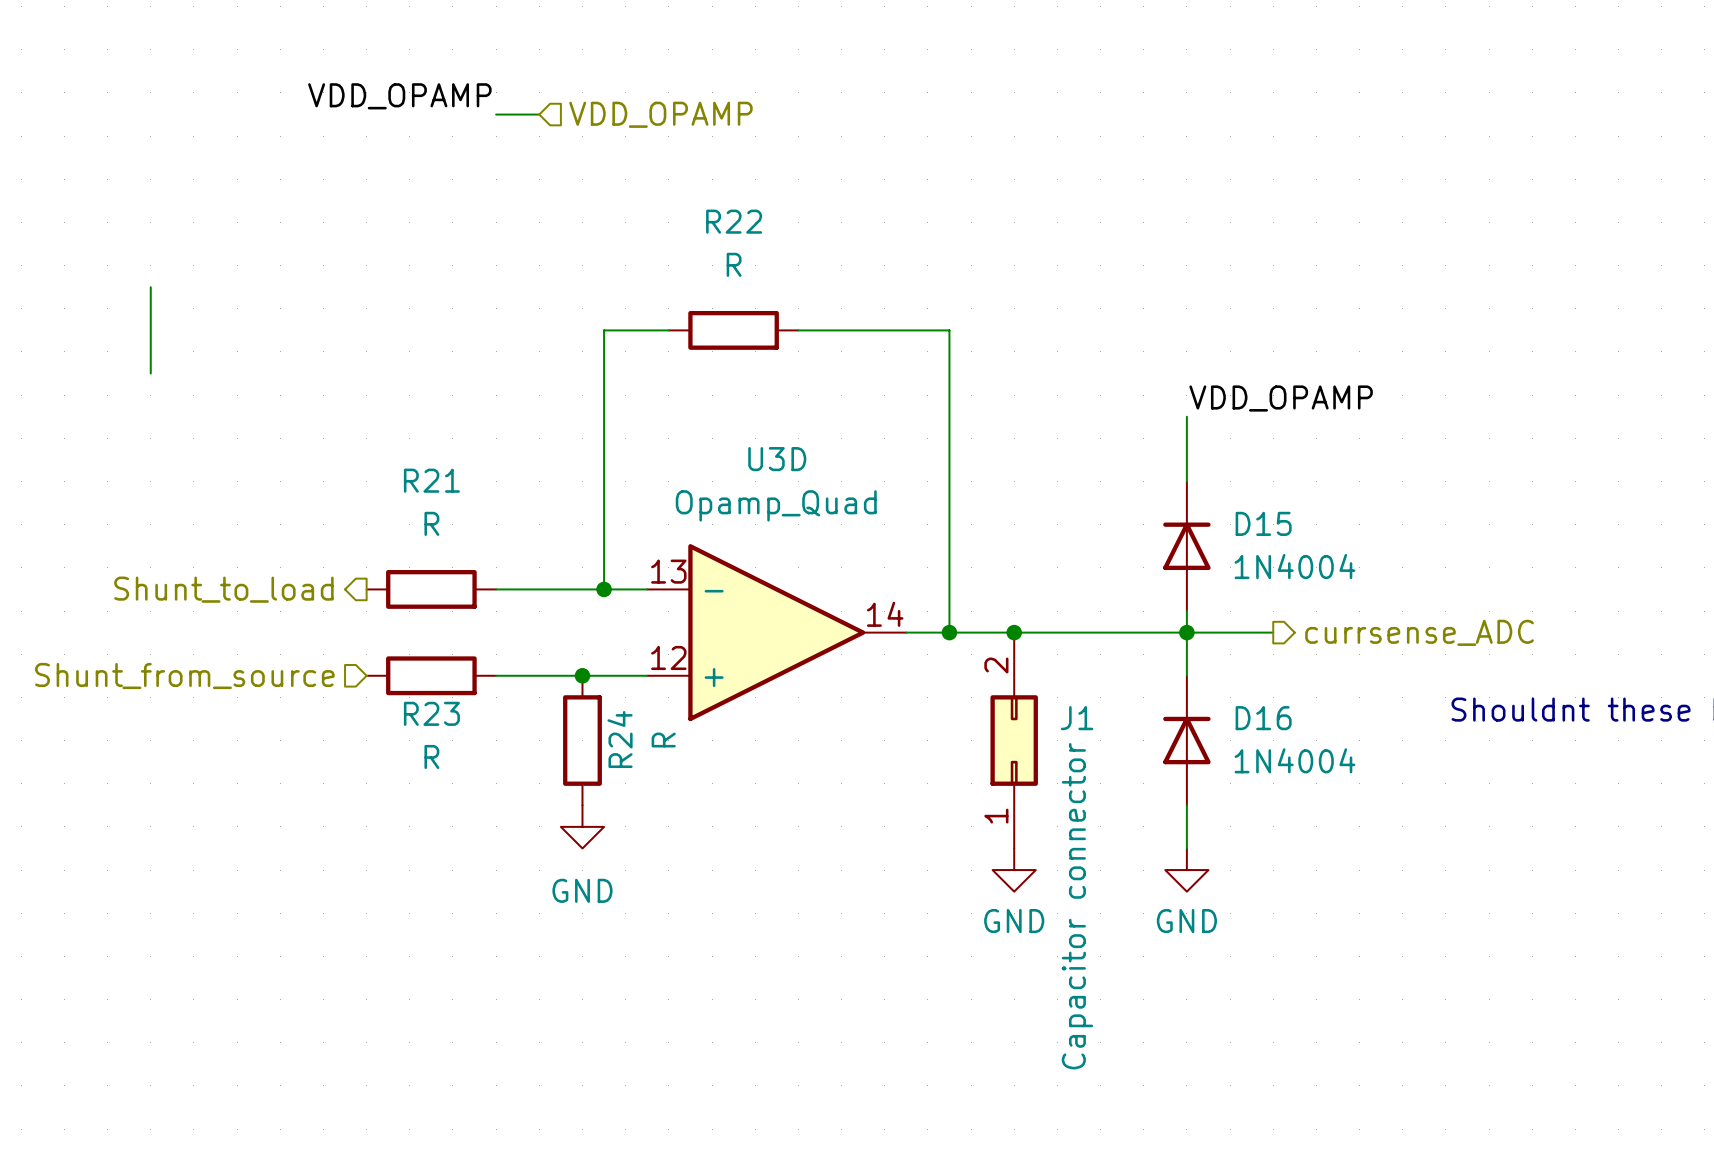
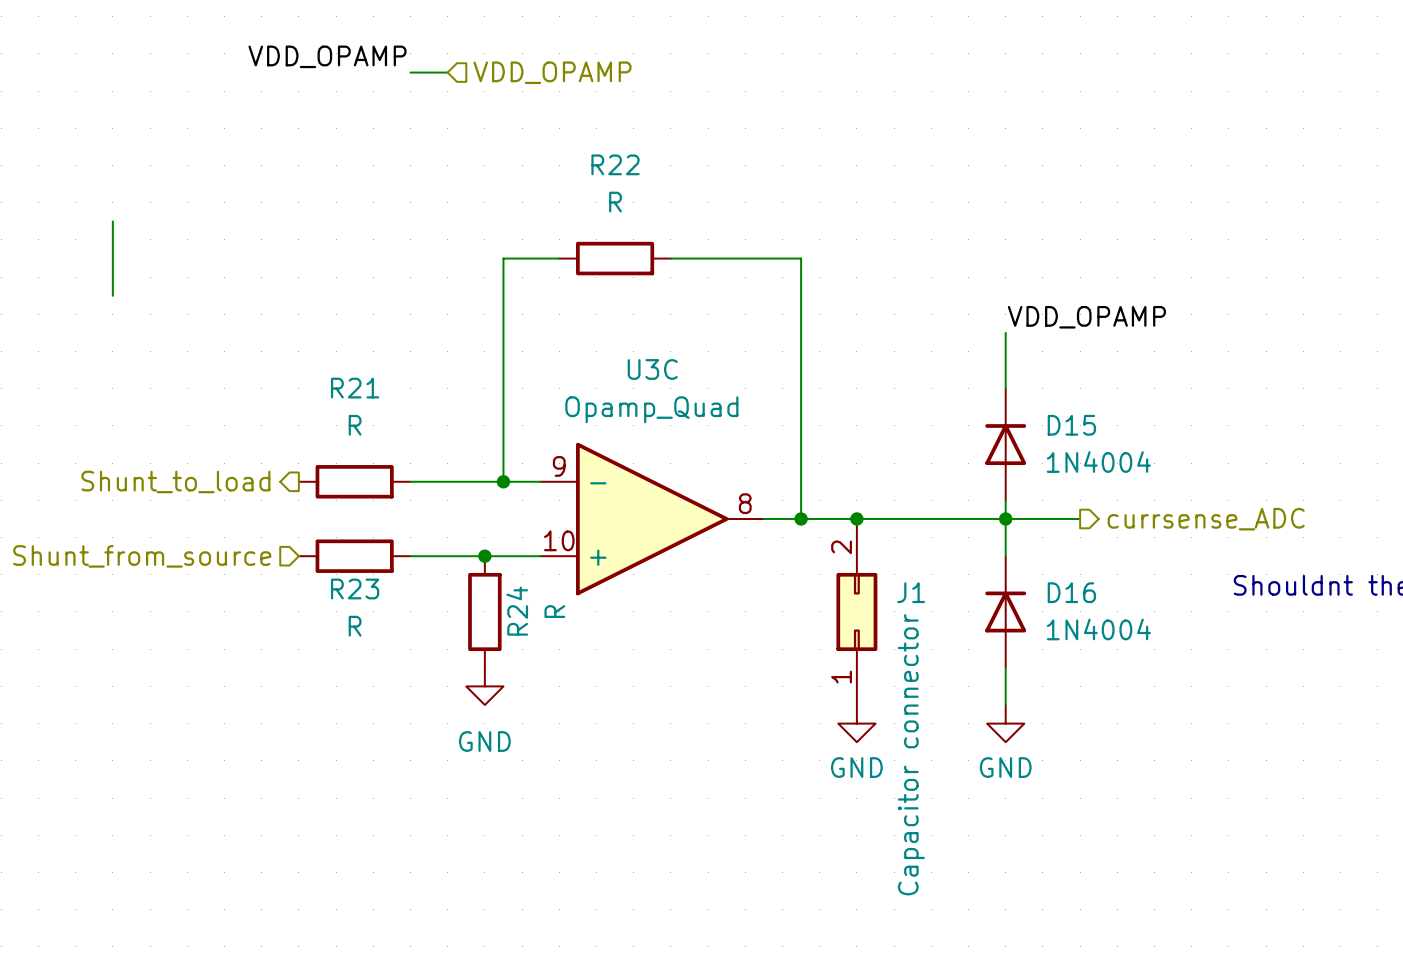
U3D name: U3D (777, 459) -> U3C (652, 369)
U3D pin number: 13 (668, 571) -> 9 (559, 466)
U3D pin number: 14 (885, 614) -> 8 (745, 503)
U3D pin number: 12 (668, 657) -> 10 (559, 540)

